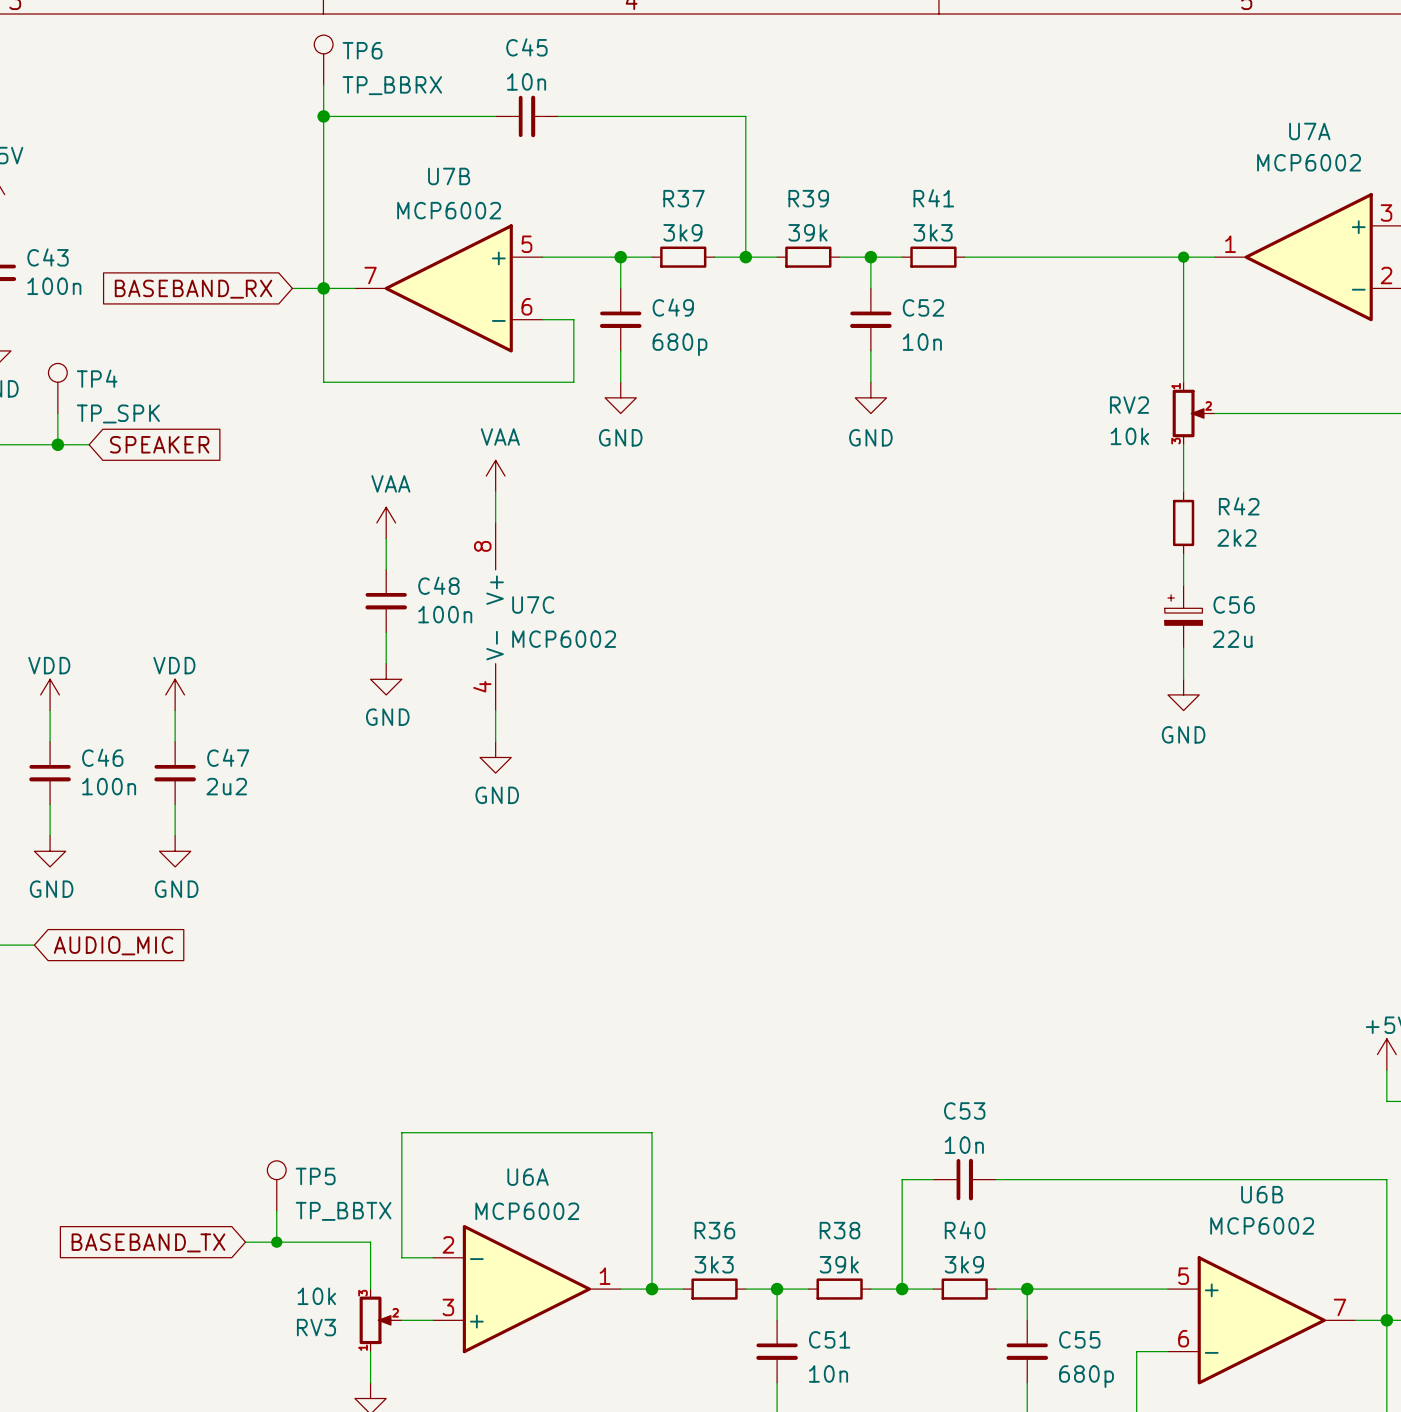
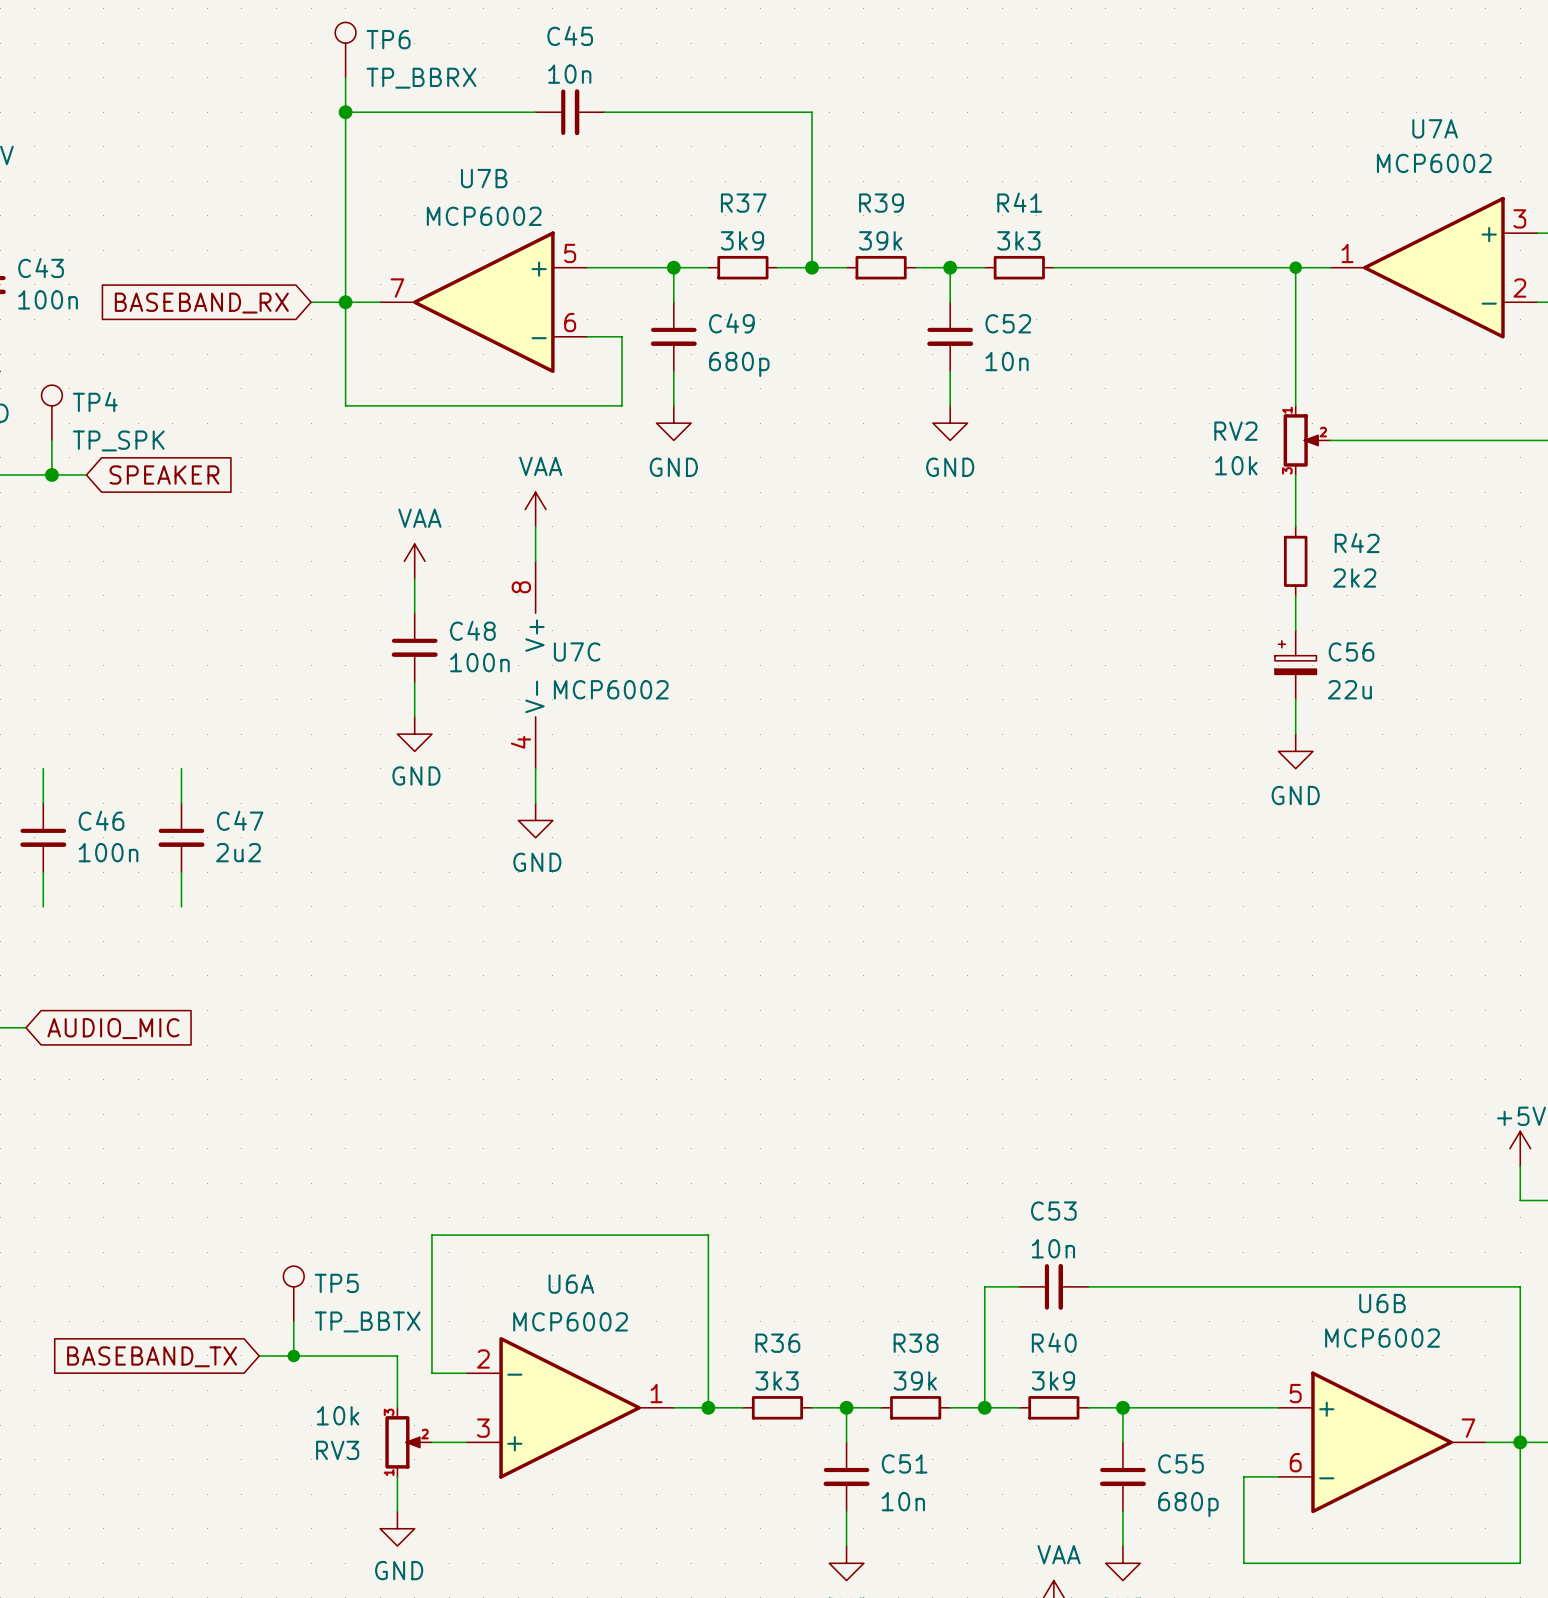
power symbol: VDD (50, 694) -> none
power symbol: VDD (175, 694) -> none
power symbol: GND (50, 851) -> none
power symbol: GND (175, 851) -> none

